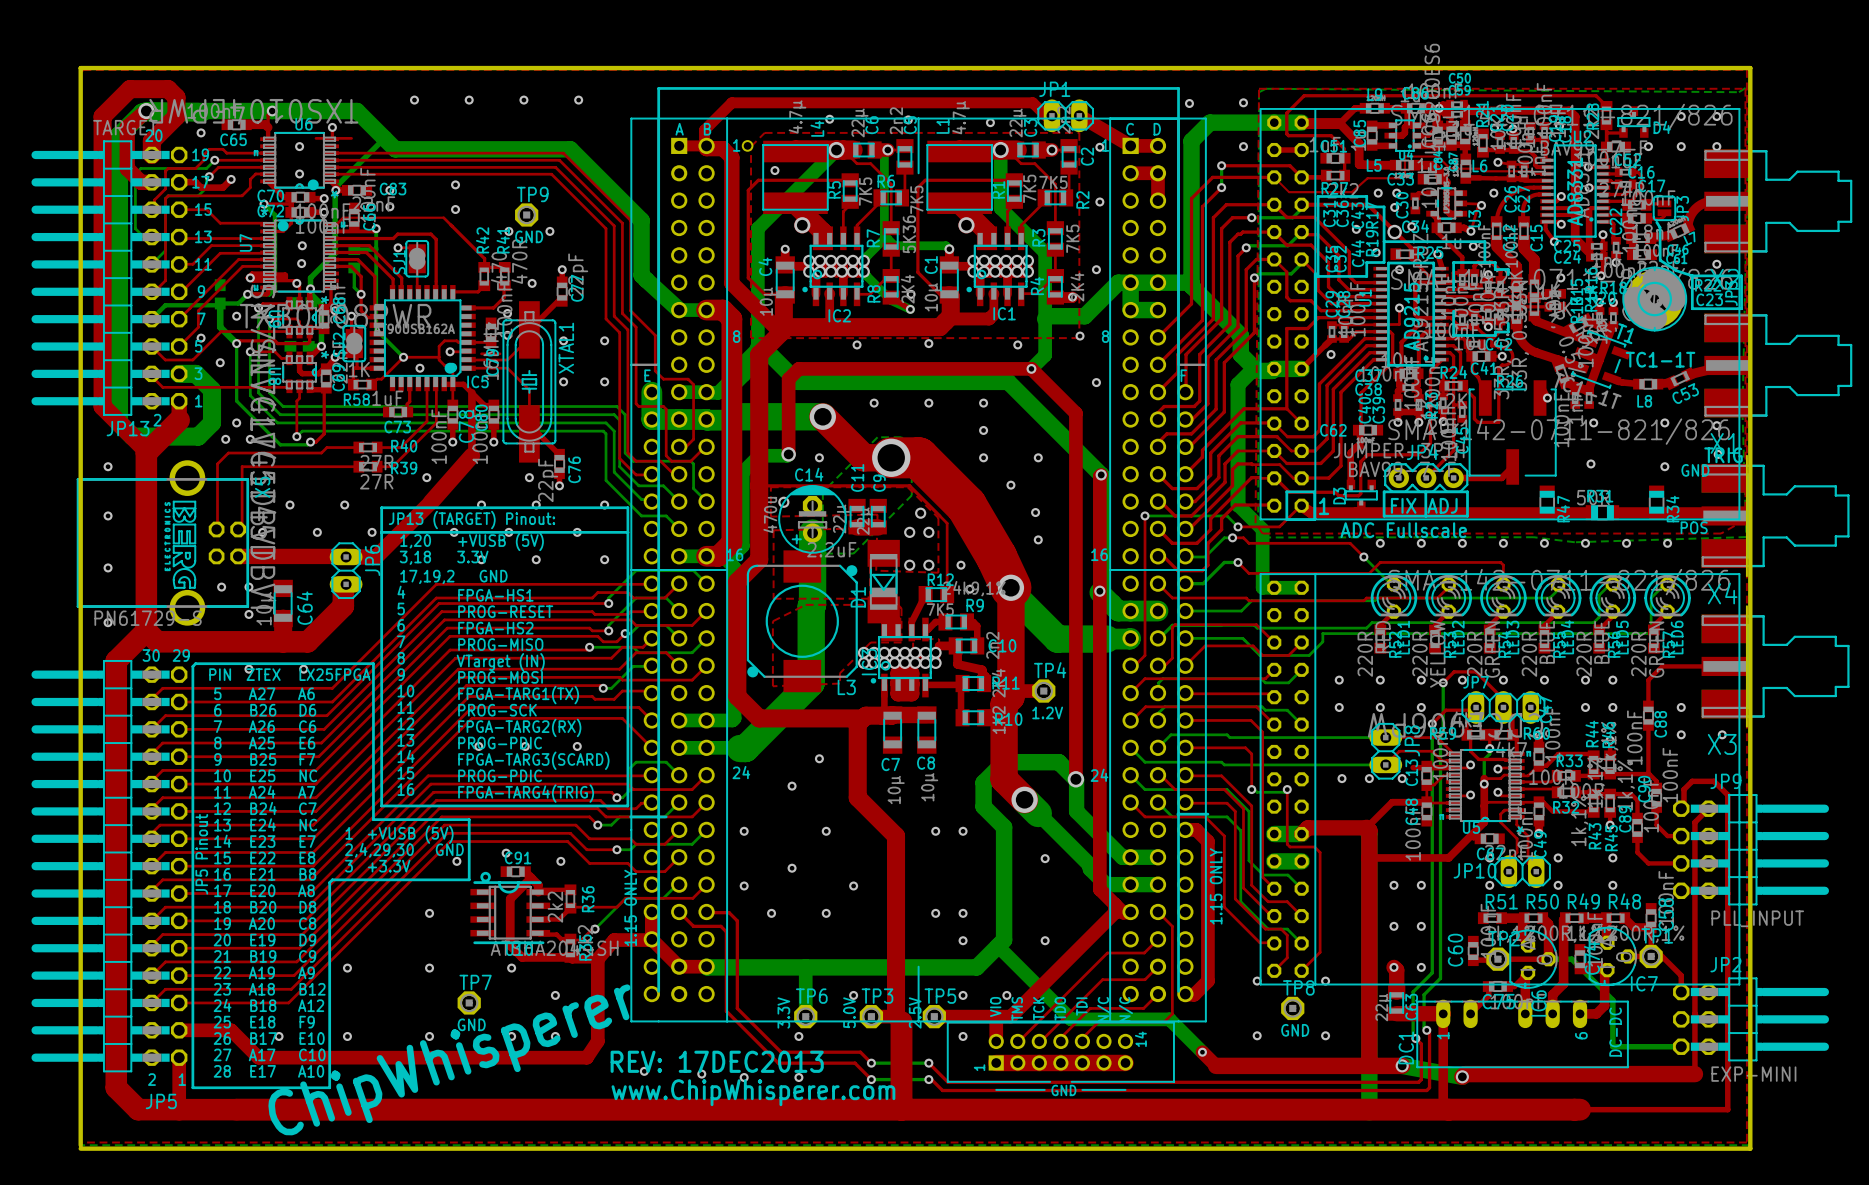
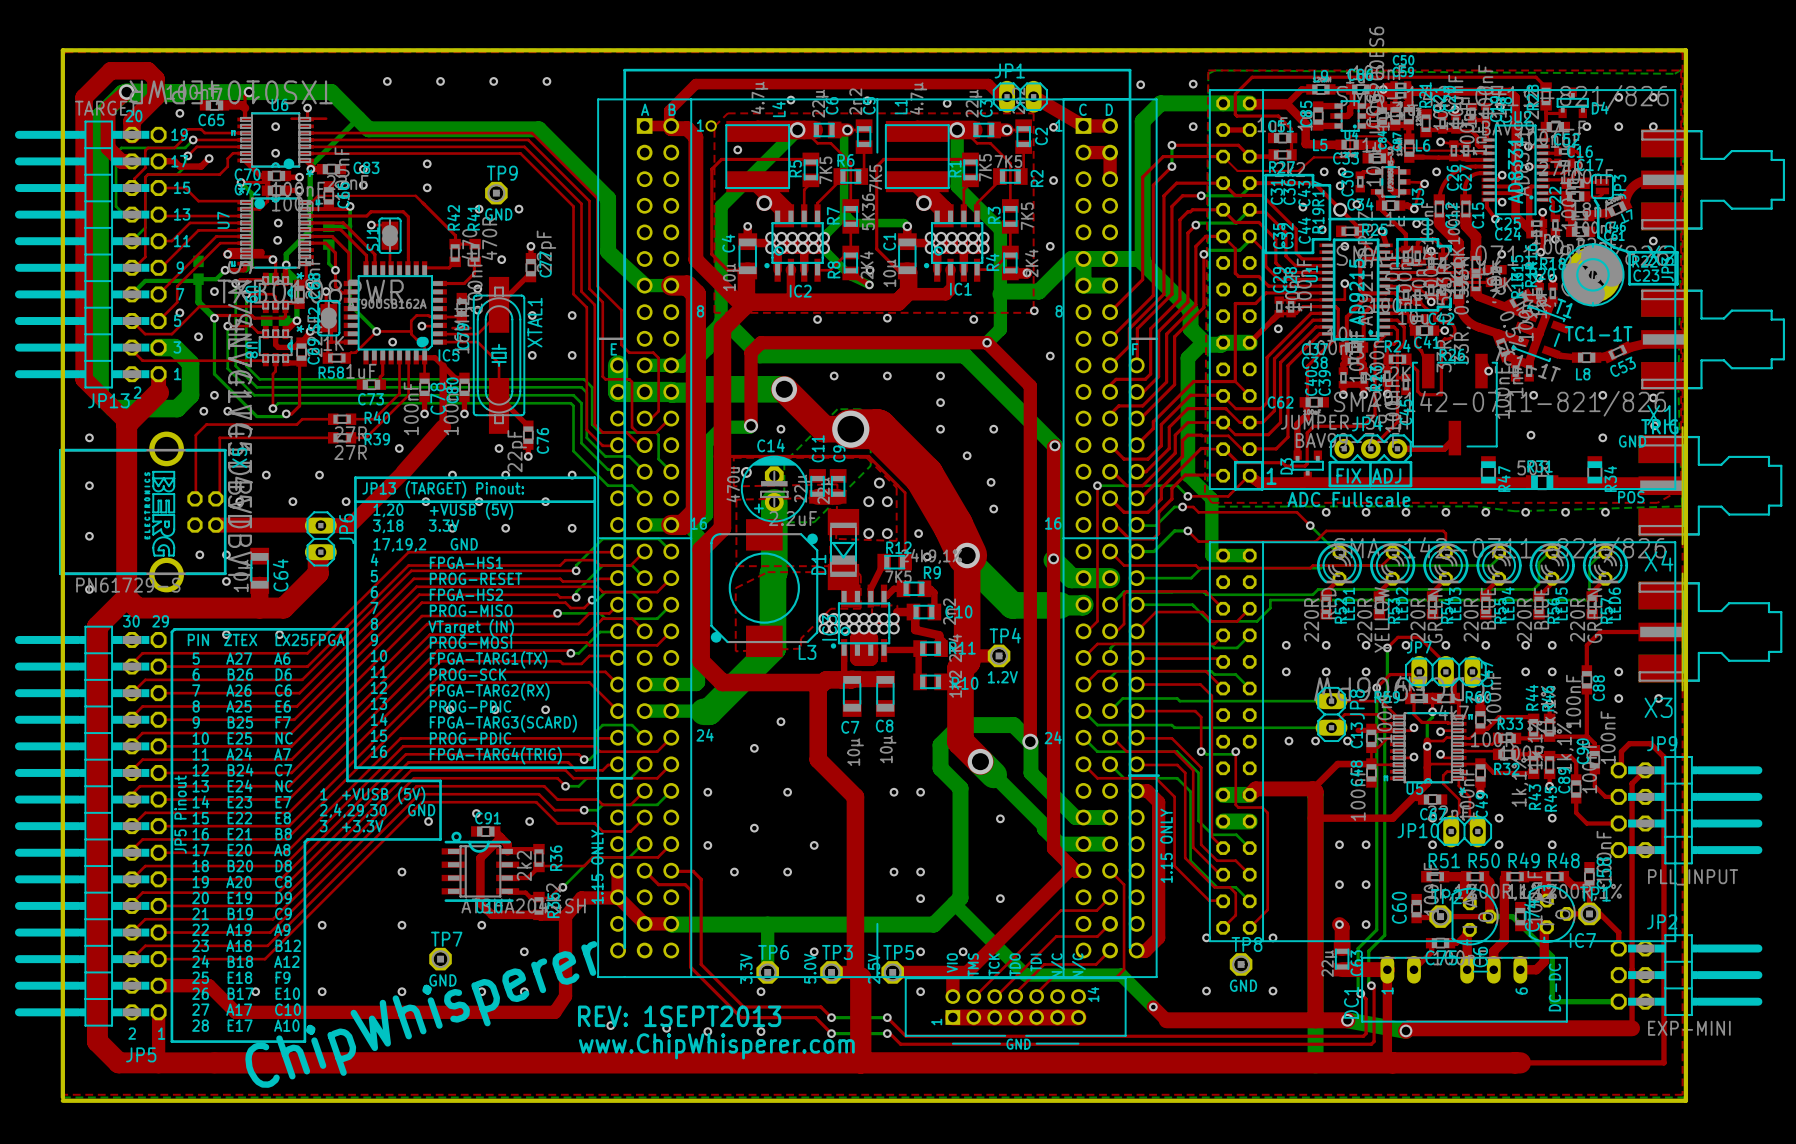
text: REV: 17DEC2013 (717, 1061) -> REV: 1SEPT2013 (679, 1016)

